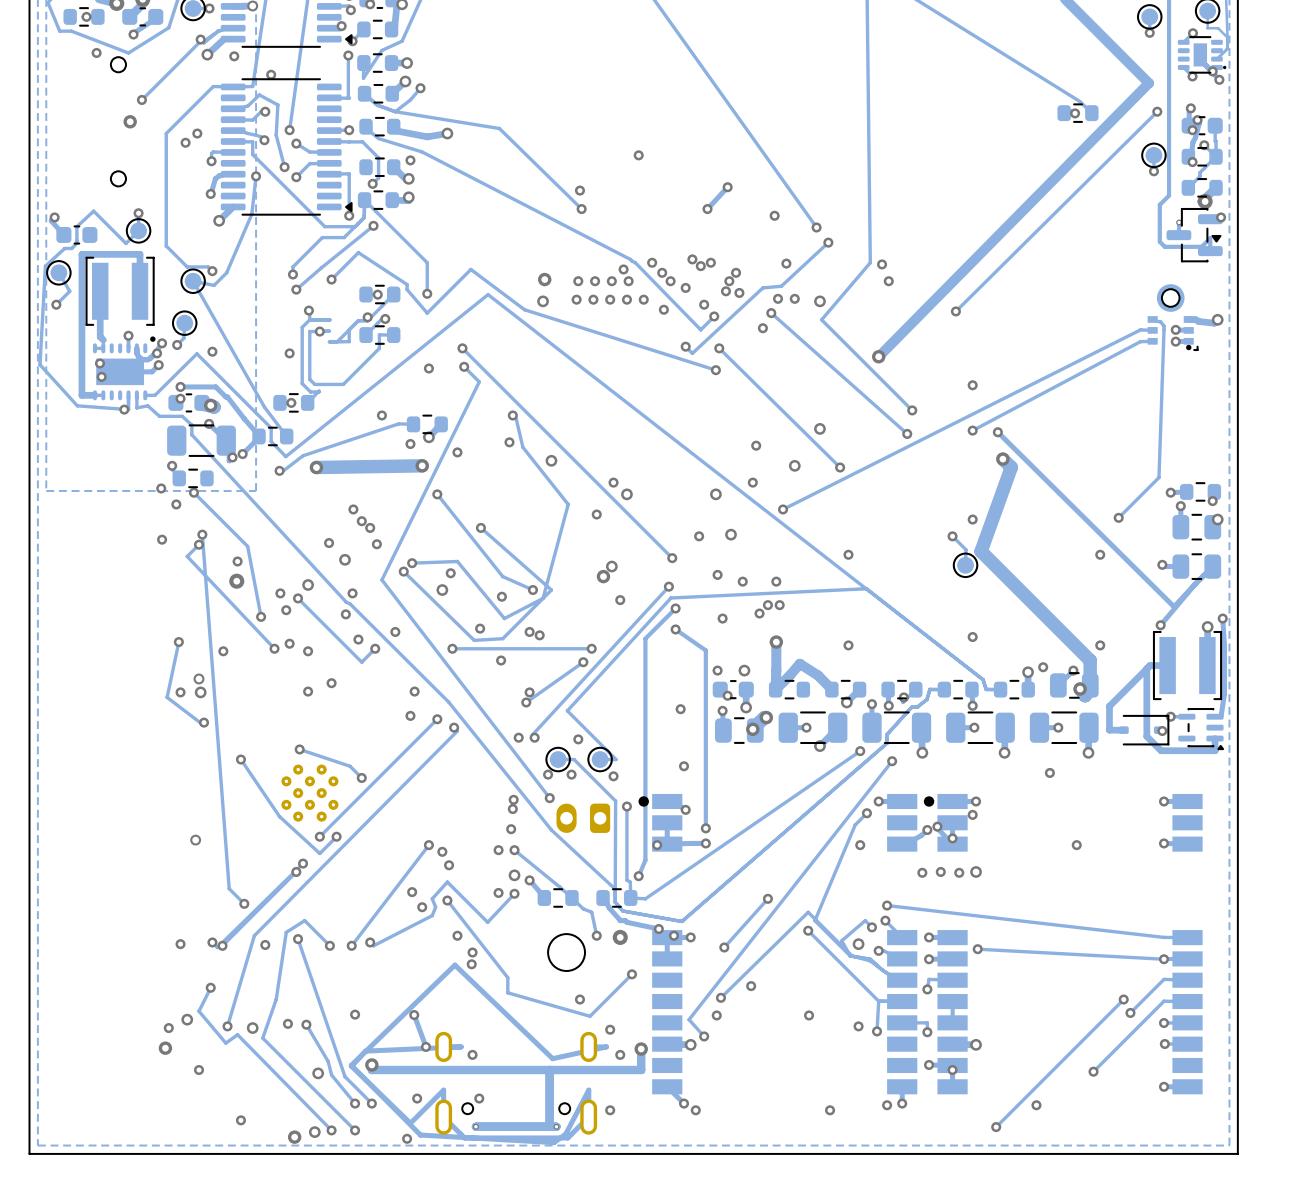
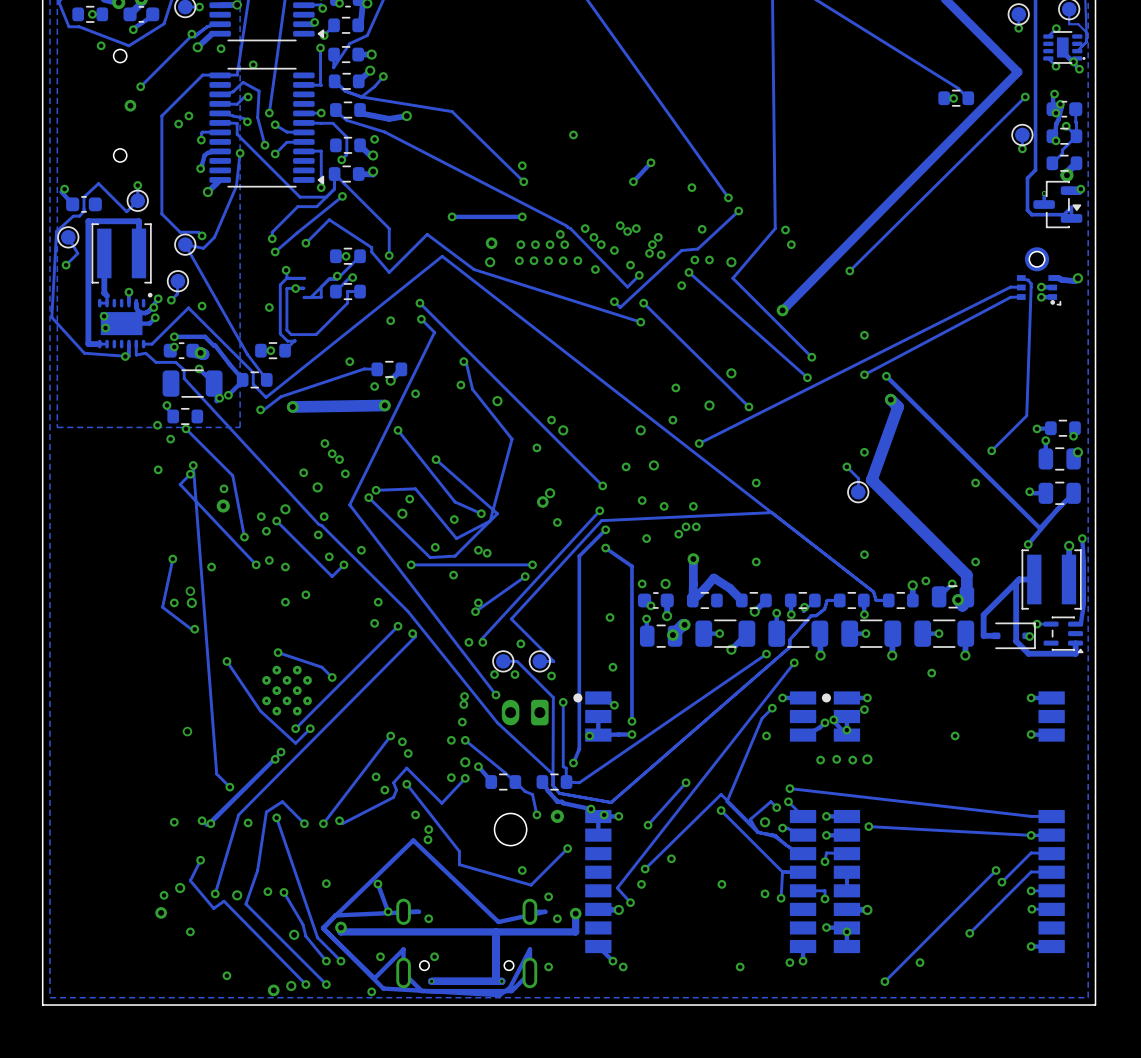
via: none -> (452, 216)
track: none -> (522, 216) (452, 216)
via: none -> (522, 216)

